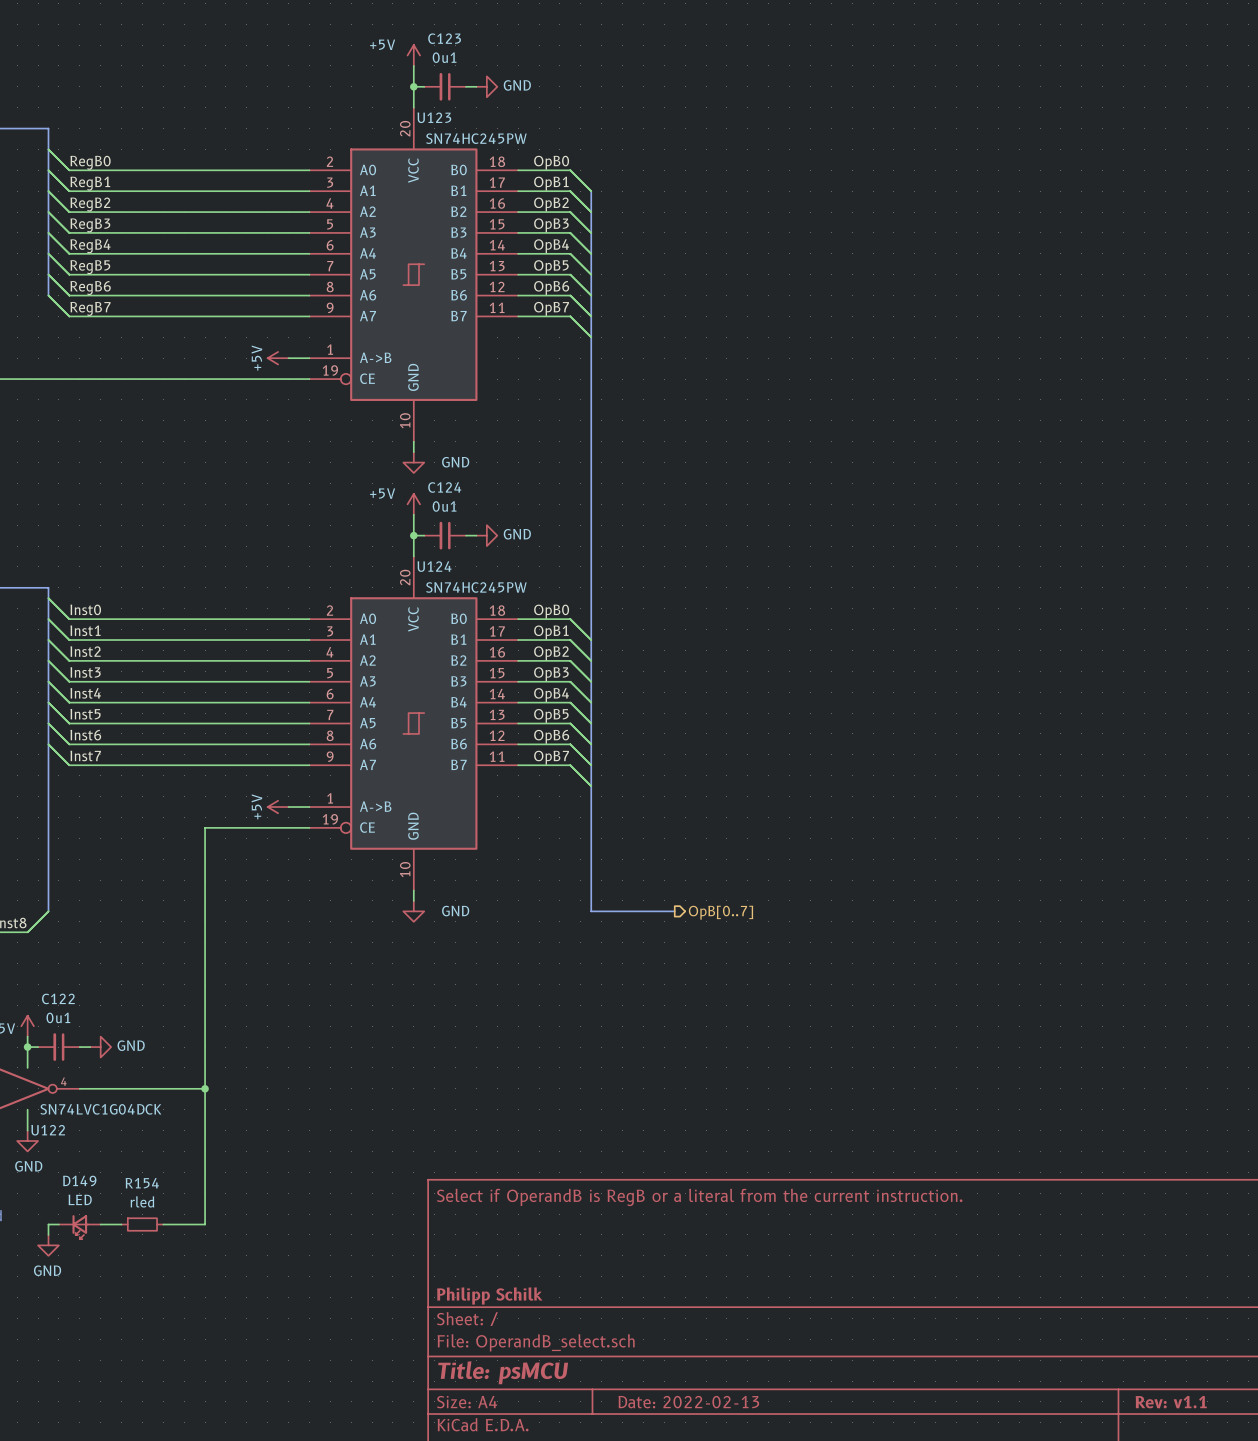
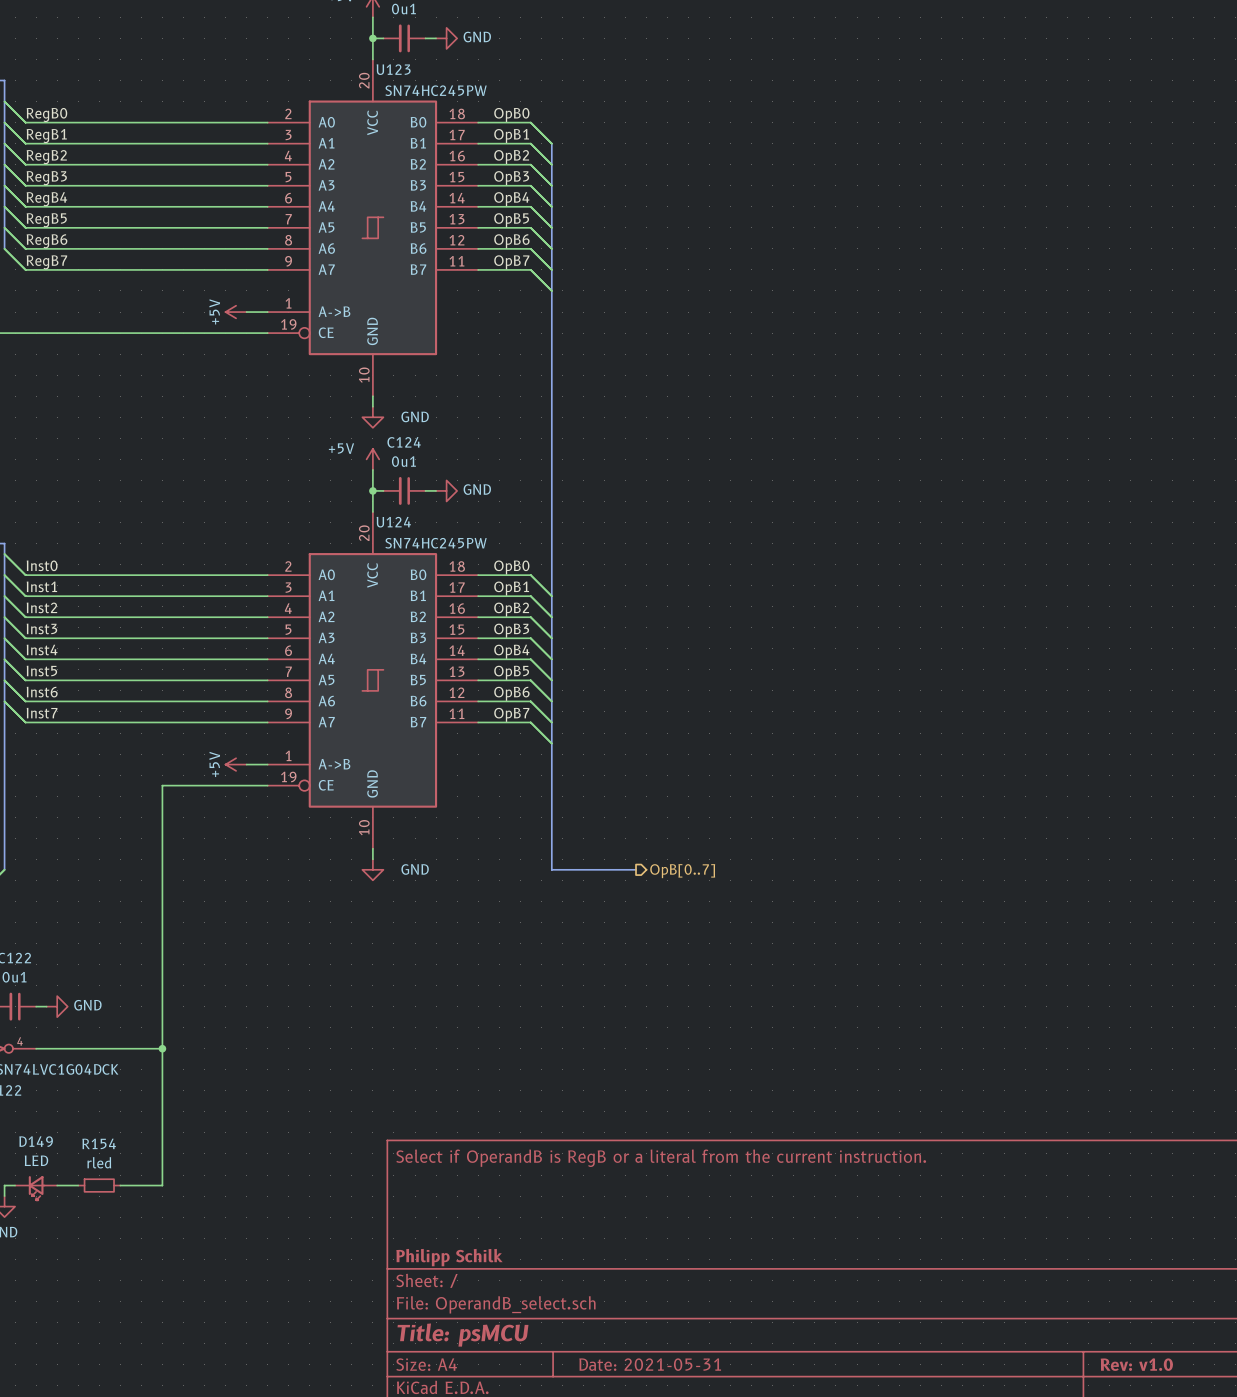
title block: Date: 2022-02-13 (688, 1402) -> Date: 2021-05-31 (650, 1364)
title block: Rev: v1.1 (1171, 1402) -> Rev: v1.0 (1136, 1364)

